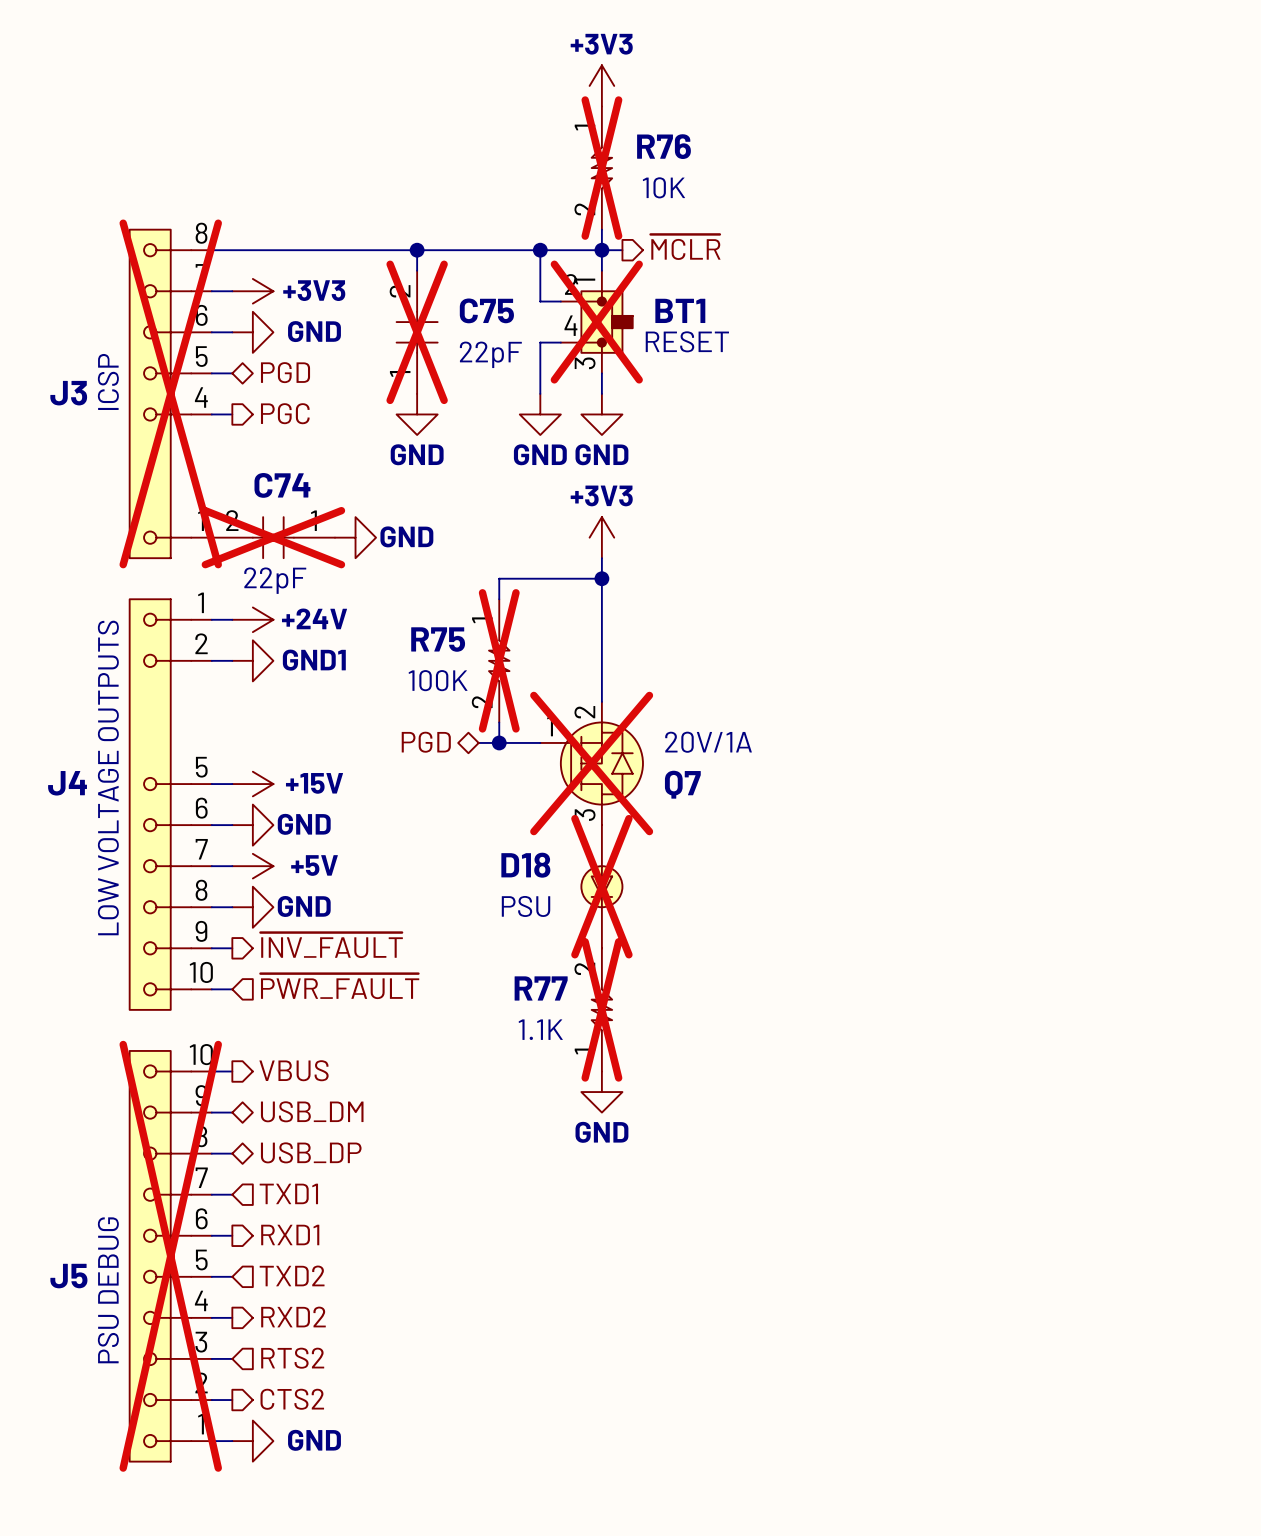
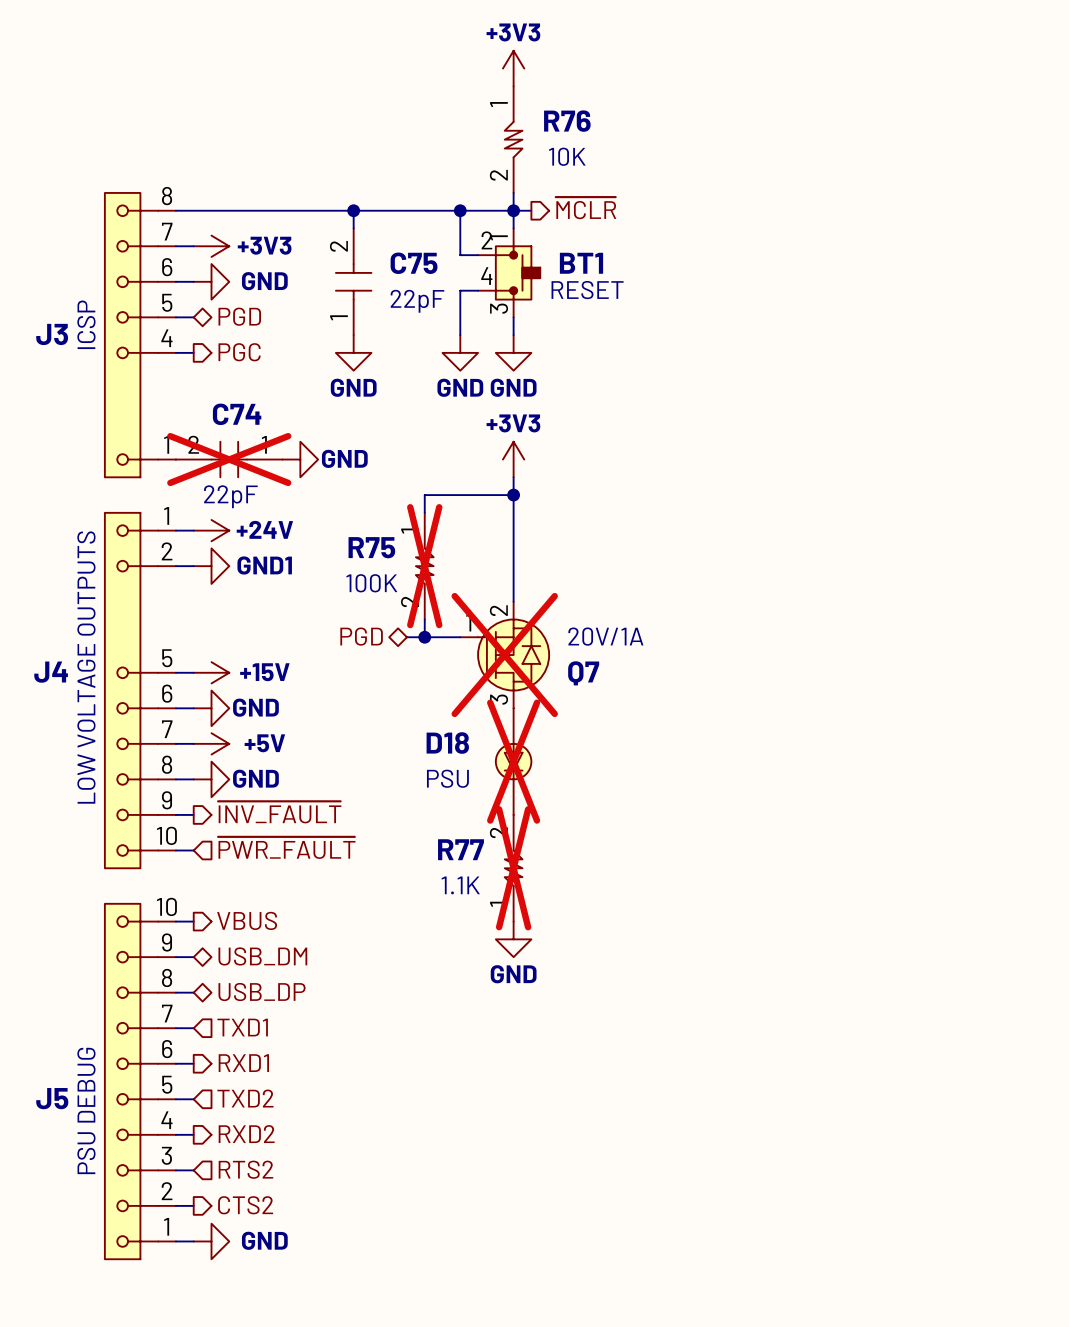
R76 do-not-place cross: (601, 168) -> none
BT1 do-not-place cross: (596, 322) -> none
C75 do-not-place cross: (417, 332) -> none
J3 do-not-place cross: (170, 393) -> none
J5 do-not-place cross: (170, 1256) -> none

